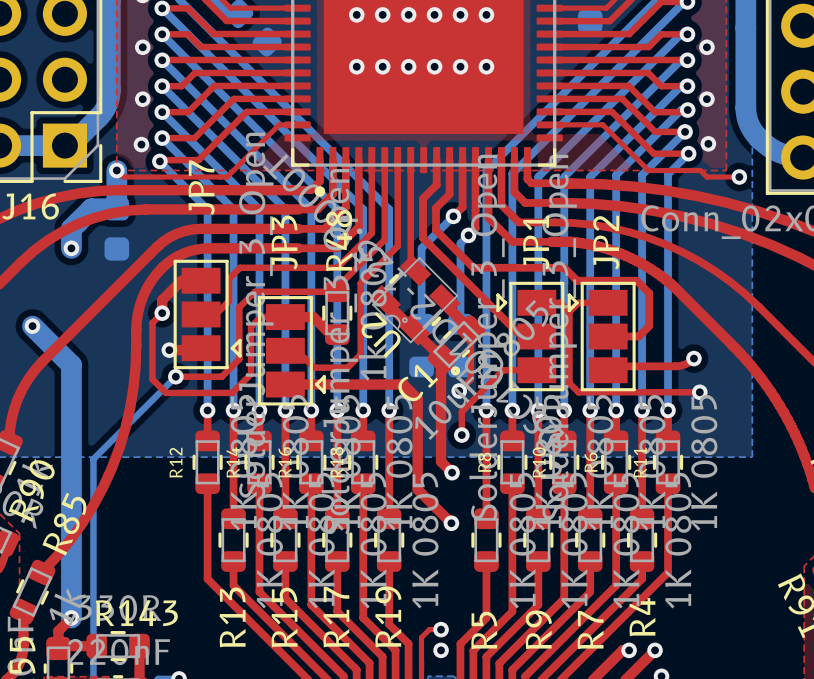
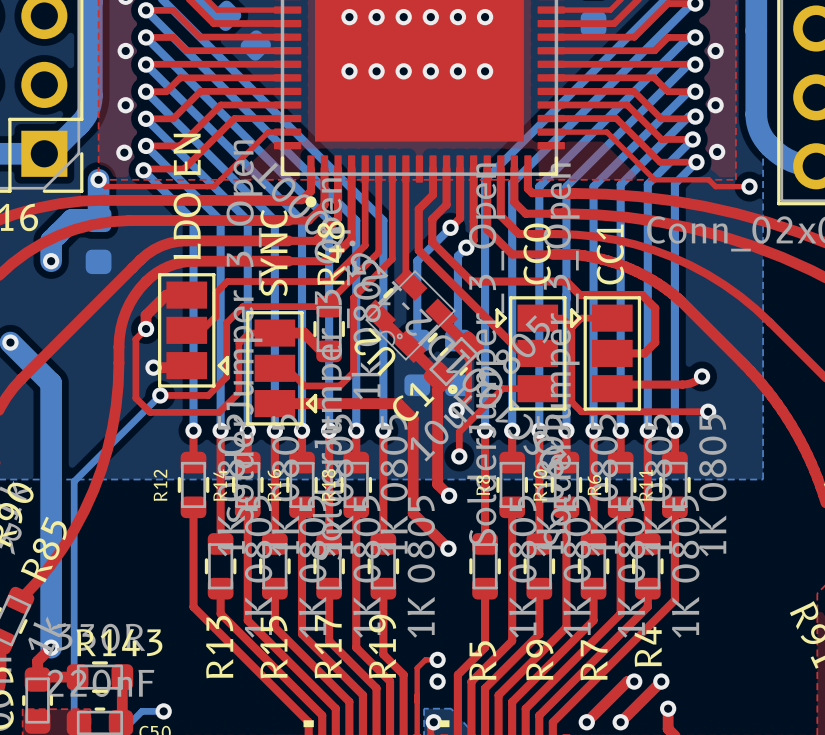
JP7 name: JP7 (201, 187) -> LDO EN (187, 196)
JP3 name: JP3 (284, 242) -> SYNC (274, 253)
JP1 name: JP1 (536, 242) -> CC0 (537, 253)
JP2 name: JP2 (606, 242) -> CC1 (610, 254)

